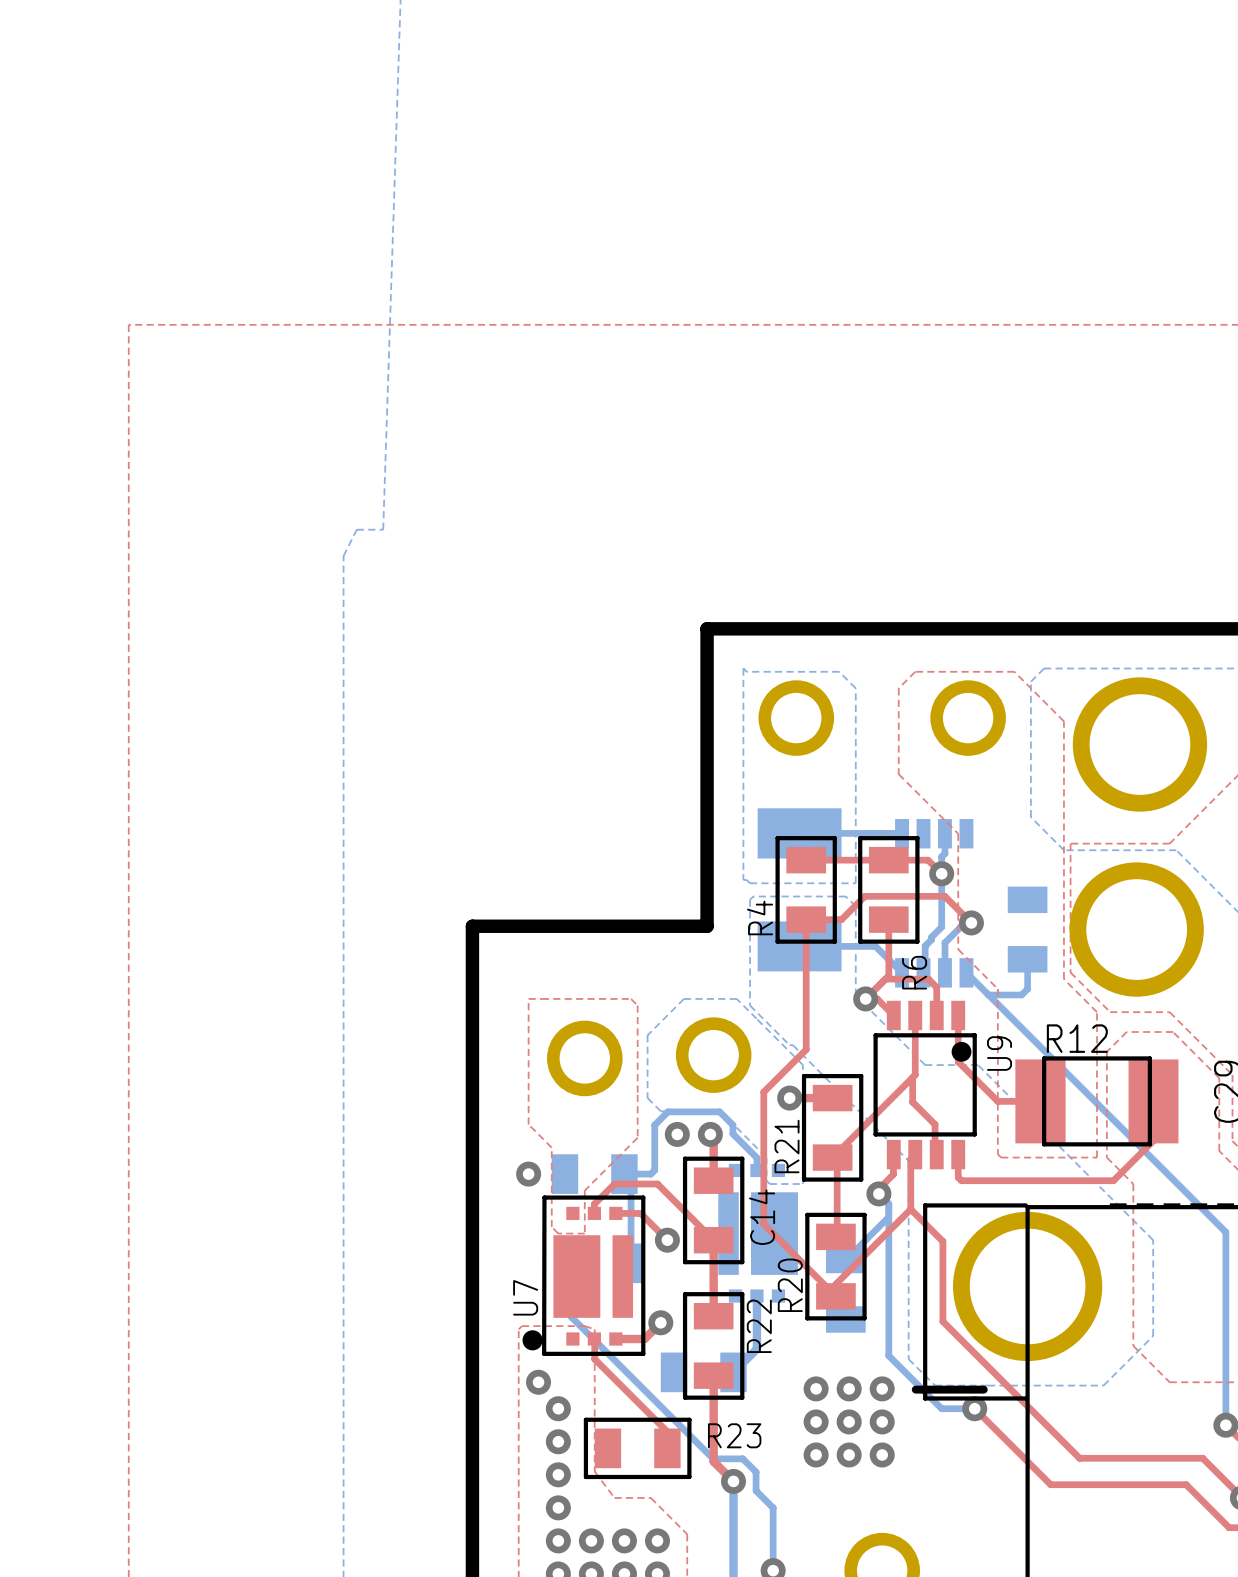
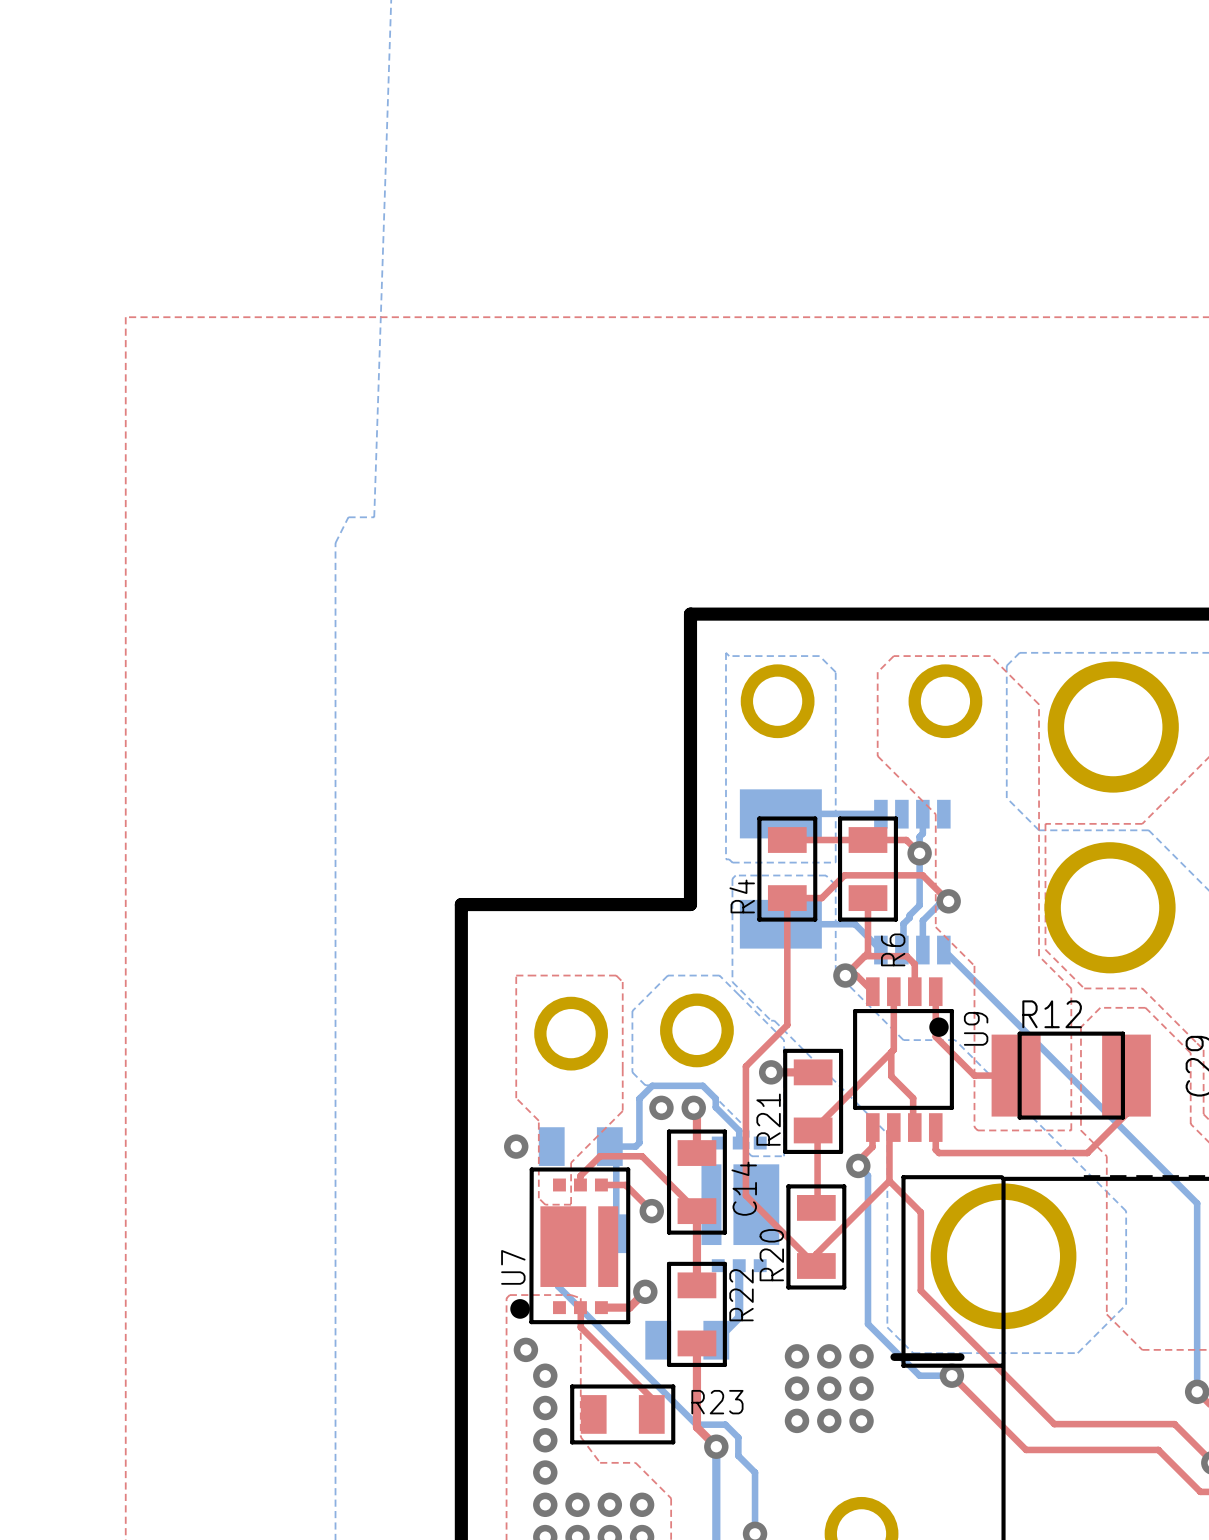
part: (1027, 929) -> none
bottom track: (1027, 959) (1027, 989) (1021, 994) (988, 994) -> none
bottom track: (888, 1203) (888, 1217) (845, 1260) -> none
part: (845, 1289) -> none

